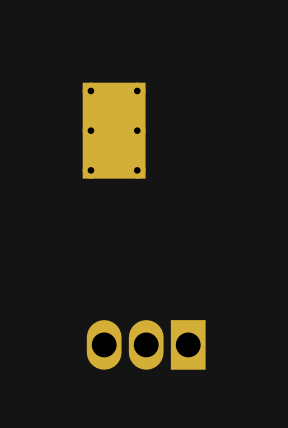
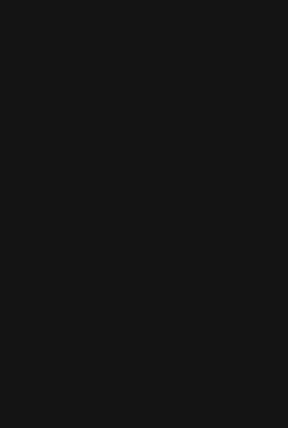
part: (114, 130) -> none
part: (146, 344) -> none

